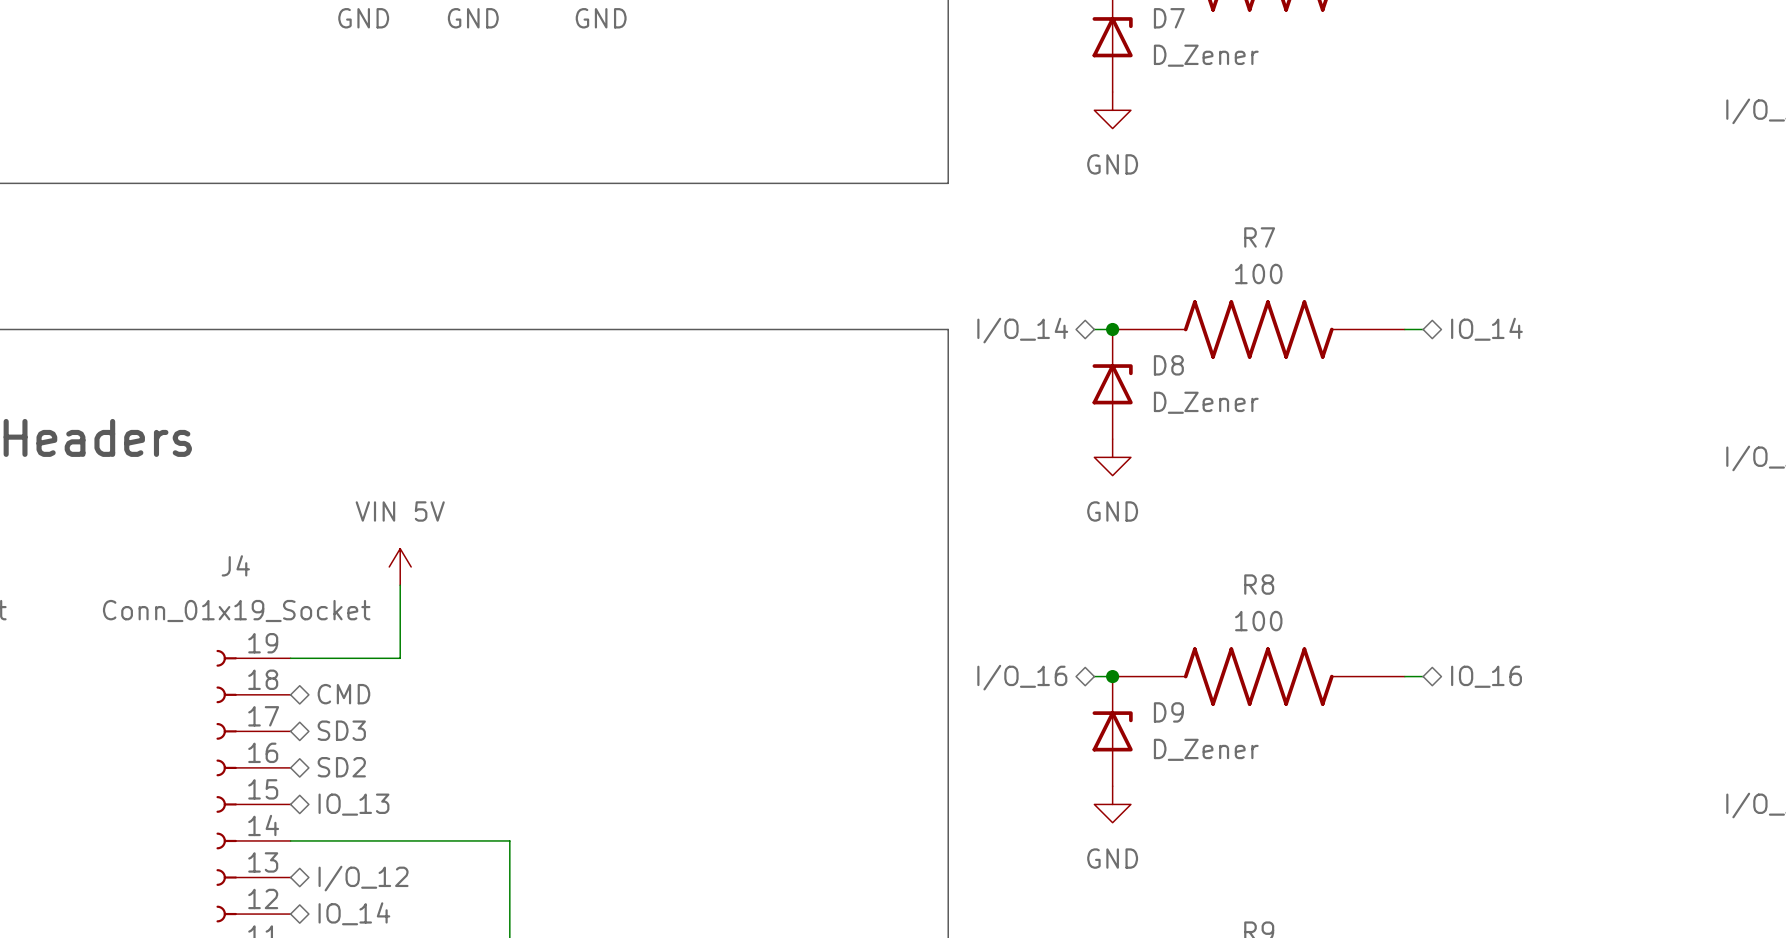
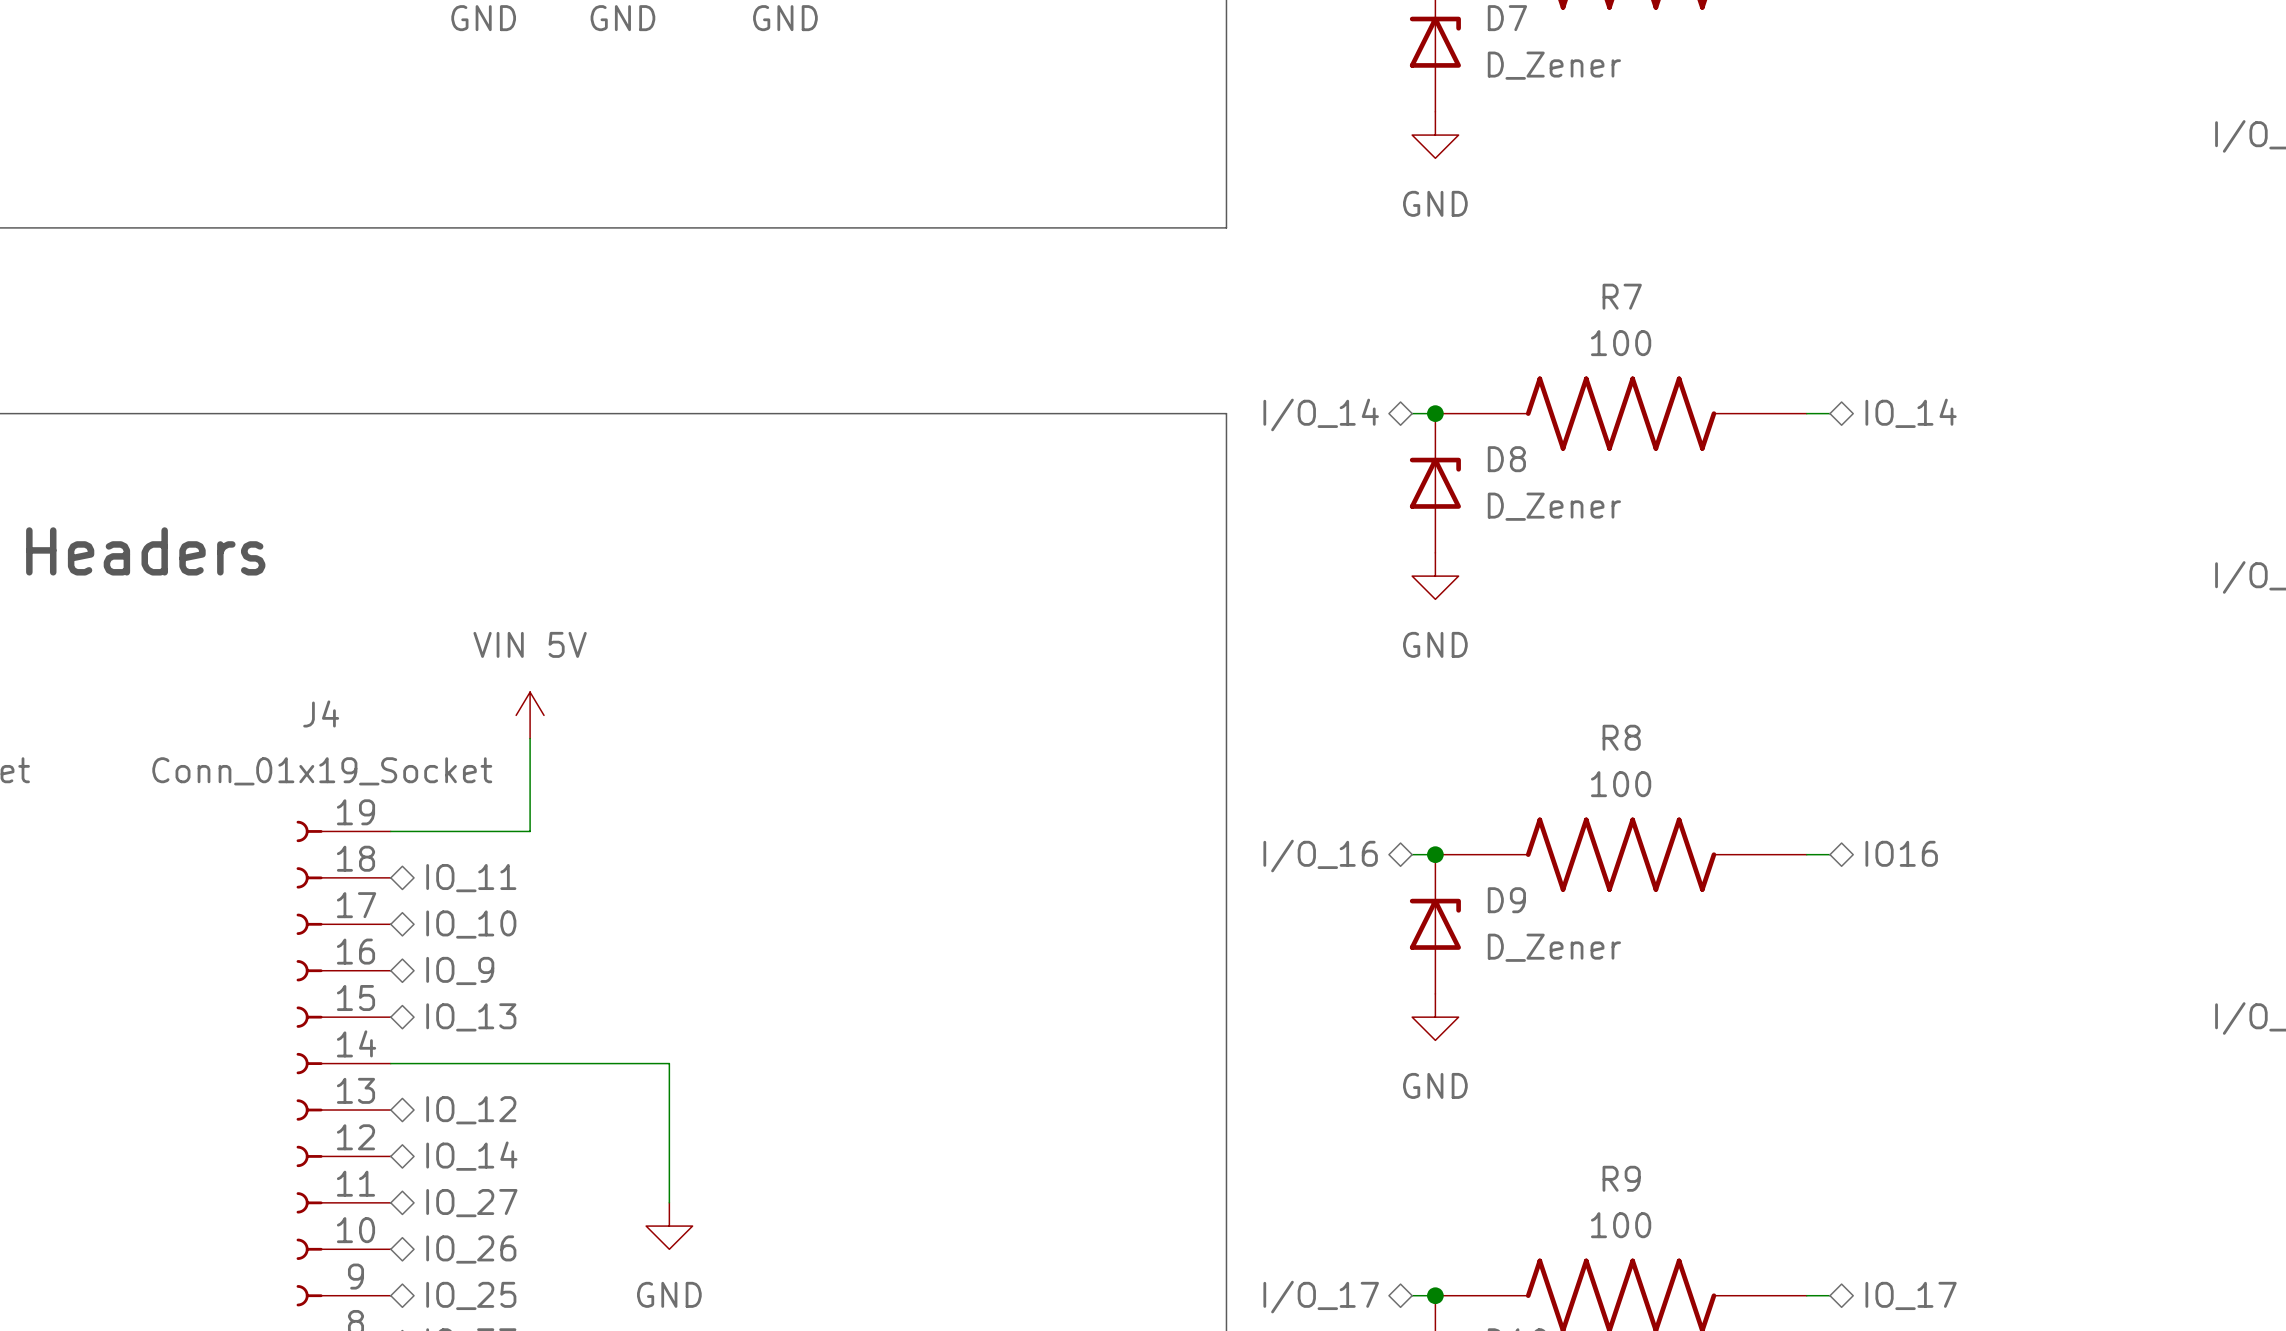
hierarchical label: IO_16 (1486, 676) -> IO16 (1901, 853)
hierarchical label: CMD (343, 694) -> IO_11 (471, 878)
hierarchical label: SD3 (341, 730) -> IO_10 (471, 924)
hierarchical label: SD2 (341, 767) -> IO_9 (460, 970)
hierarchical label: I/O_12 (363, 878) -> IO_12 (471, 1110)

